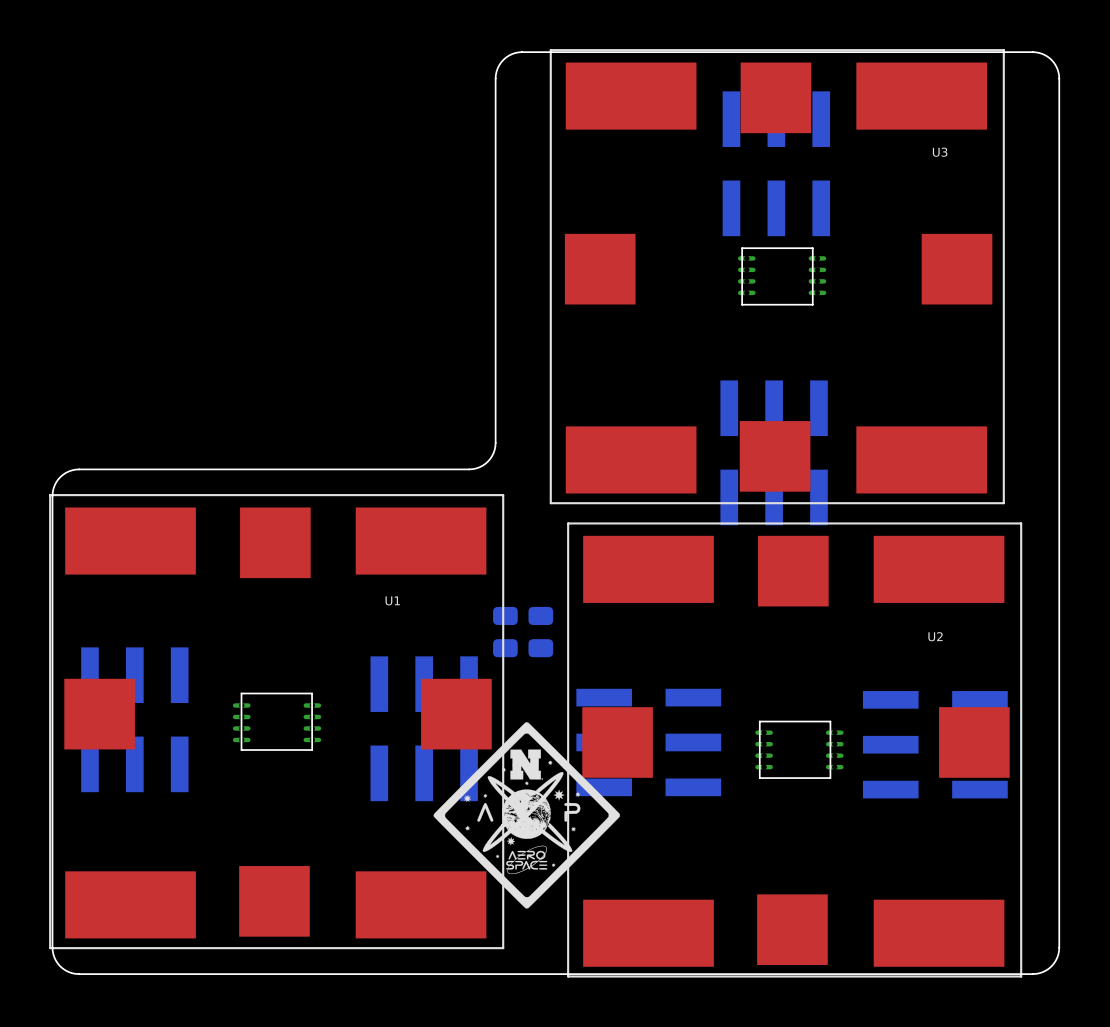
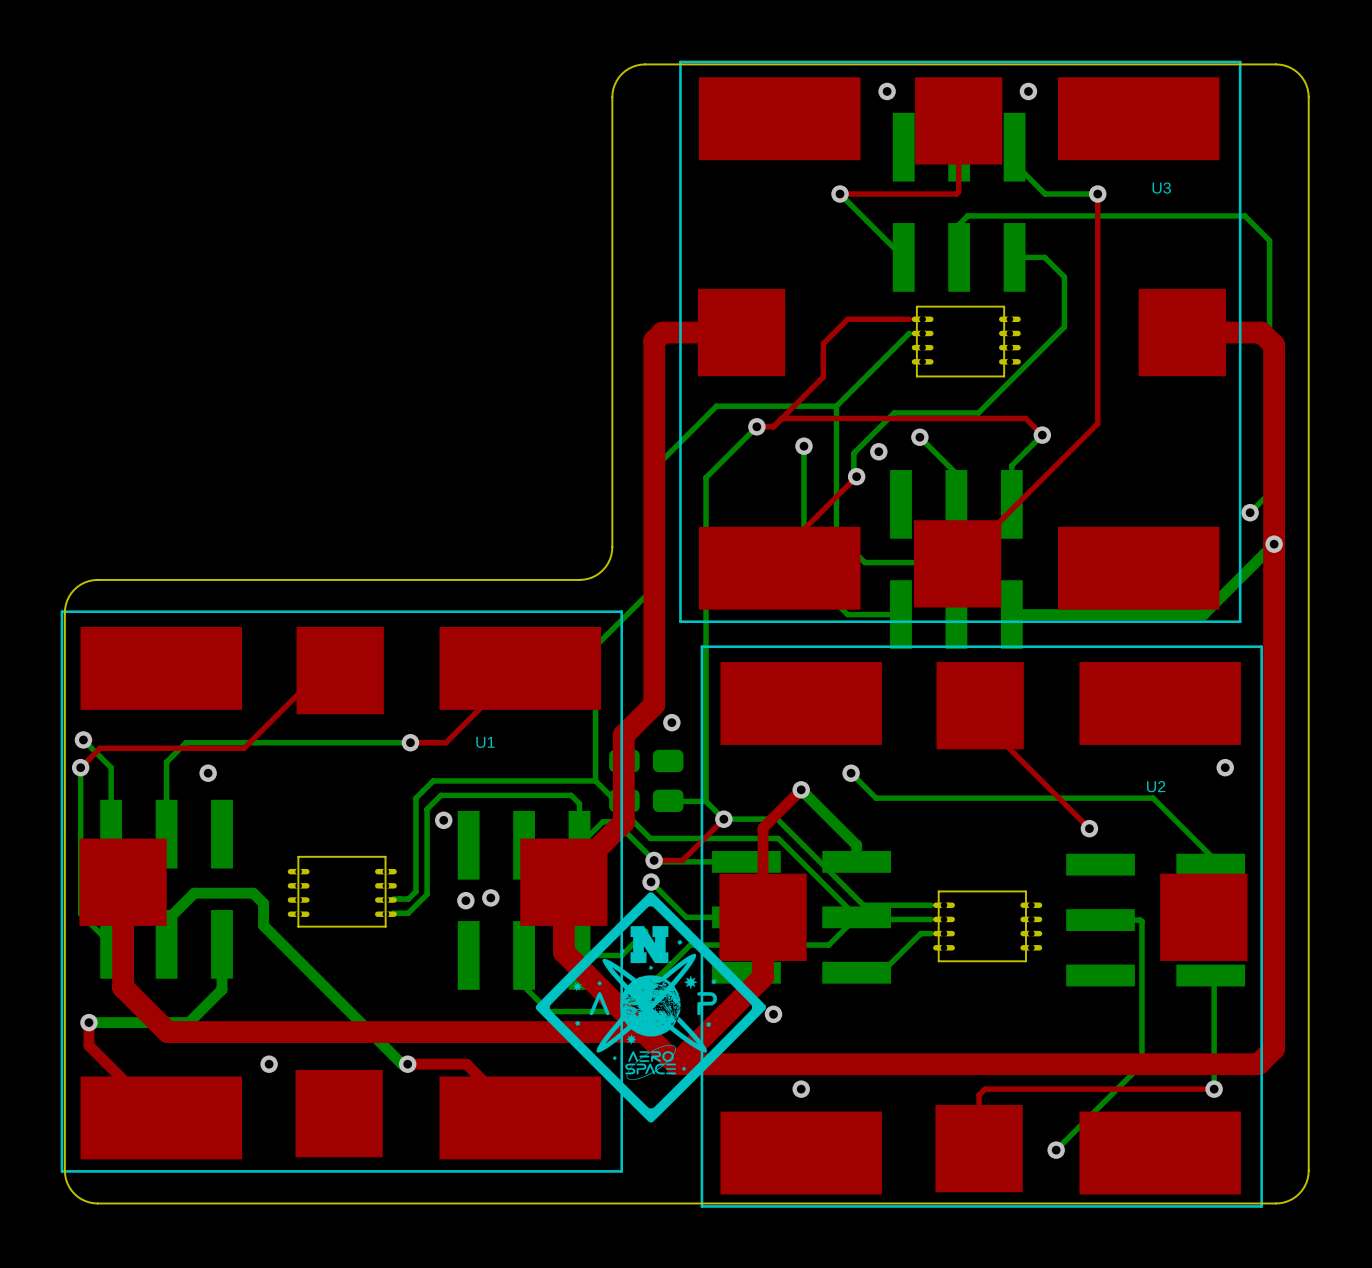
via: none -> (887, 91)
via: none -> (1028, 91)
top track: none -> (958, 120) (958, 191) (956, 194) (840, 194)
bottom track: none -> (1014, 147) (1014, 163) (1045, 194) (1097, 194)
bottom track: none -> (840, 194) (903, 257)
via: none -> (840, 194)
top track: none -> (1097, 194) (1097, 423) (957, 563)
via: none -> (1097, 194)
bottom track: none -> (959, 257) (959, 224) (967, 215) (1244, 215) (1269, 240) (1269, 493) (1250, 512)
bottom track: none -> (1014, 257) (1044, 257) (1064, 277) (1064, 326) (978, 412) (894, 412) (853, 453) (853, 473) (856, 476)
top track: none -> (741, 306) (741, 332) (662, 332) (654, 340) (654, 704) (623, 735) (623, 822) (563, 882) (563, 952) (675, 1064)
top track: none -> (909, 319) (847, 319) (823, 343) (823, 376) (773, 426) (756, 426)
bottom track: none -> (909, 333) (836, 406)
top track: none -> (1182, 332) (1261, 332) (1274, 345) (1274, 1048) (1258, 1064) (675, 1064)
bottom track: none -> (836, 406) (836, 534) (864, 562) (928, 562) (956, 590) (956, 614)
bottom track: none -> (836, 406) (716, 406) (657, 465) (657, 584) (595, 646) (595, 780)
top track: none -> (781, 418) (1025, 418) (1042, 435)
bottom track: none -> (756, 426) (706, 477) (706, 801)
via: none -> (756, 426)
bottom track: none -> (1042, 435) (1011, 465) (1011, 504)
via: none -> (1042, 435)
bottom track: none -> (919, 437) (956, 473) (956, 504)
via: none -> (919, 437)
bottom track: none -> (803, 446) (803, 570) (847, 614) (900, 614)
via: none -> (803, 446)
via: none -> (878, 451)
top track: none -> (856, 476) (779, 553) (779, 568)
via: none -> (856, 476)
via: none -> (1250, 512)
bottom track: none -> (1274, 544) (1203, 614) (1011, 614)
via: none -> (1274, 544)
top track: none -> (520, 668) (445, 742) (410, 742)
top track: none -> (340, 670) (321, 670) (244, 748) (100, 748) (80, 767)
top track: none -> (980, 705) (980, 719) (1089, 828)
via: none -> (671, 722)
bottom track: none -> (83, 739) (111, 767) (111, 834)
via: none -> (83, 739)
bottom track: none -> (410, 742) (185, 742) (166, 762) (166, 834)
via: none -> (410, 742)
bottom track: none -> (80, 767) (80, 913) (111, 944)
via: none -> (80, 767)
via: none -> (1225, 767)
via: none -> (208, 773)
bottom track: none -> (851, 773) (876, 798) (1153, 798) (1210, 855) (1210, 864)
via: none -> (851, 773)
bottom track: none -> (595, 780) (615, 800) (617, 800)
bottom track: none -> (595, 780) (433, 780) (416, 798) (416, 891) (408, 899) (393, 899)
bottom track: none -> (801, 789) (856, 845) (856, 861)
top track: none -> (801, 789) (763, 828) (763, 977) (675, 1064)
via: none -> (801, 789)
bottom track: none -> (624, 800) (624, 812) (650, 838) (778, 838) (859, 919) (931, 919)
bottom track: none -> (672, 801) (706, 801)
bottom track: none -> (706, 801) (723, 819)
bottom track: none -> (723, 819) (777, 819) (863, 905) (931, 905)
via: none -> (443, 820)
top track: none -> (723, 819) (682, 860) (654, 860)
via: none -> (723, 819)
via: none -> (1089, 828)
via: none -> (654, 860)
bottom track: none -> (746, 861) (655, 861) (615, 821) (603, 821) (579, 845) (579, 803) (571, 795) (440, 795) (427, 809) (427, 894) (408, 913) (393, 913)
bottom track: none -> (651, 882) (686, 917) (746, 917)
via: none -> (651, 882)
top track: none -> (123, 882) (123, 987) (167, 1032) (643, 1032)
via: none -> (490, 897)
via: none -> (465, 900)
bottom track: none -> (856, 917) (828, 945) (690, 945) (623, 1011) (549, 1011) (524, 986) (524, 955)
bottom track: none -> (1100, 920) (1140, 920) (1141, 921) (1141, 1064) (1056, 1150)
bottom track: none -> (646, 931) (621, 955) (579, 955)
bottom track: none -> (931, 933) (920, 933) (881, 972) (856, 972) (856, 967)
bottom track: none -> (166, 944) (166, 920) (194, 893) (253, 893) (263, 903) (263, 925) (402, 1064) (407, 1064)
bottom track: none -> (222, 944) (222, 989) (189, 1022) (88, 1022)
bottom track: none -> (1210, 975) (1214, 978) (1214, 1089)
via: none -> (773, 1014)
top track: none -> (88, 1022) (88, 1045) (161, 1117)
via: none -> (88, 1022)
via: none -> (269, 1064)
top track: none -> (407, 1064) (466, 1064) (520, 1117)
via: none -> (407, 1064)
via: none -> (801, 1089)
top track: none -> (1214, 1089) (985, 1089) (979, 1095) (979, 1148)
via: none -> (1214, 1089)
via: none -> (1056, 1150)

